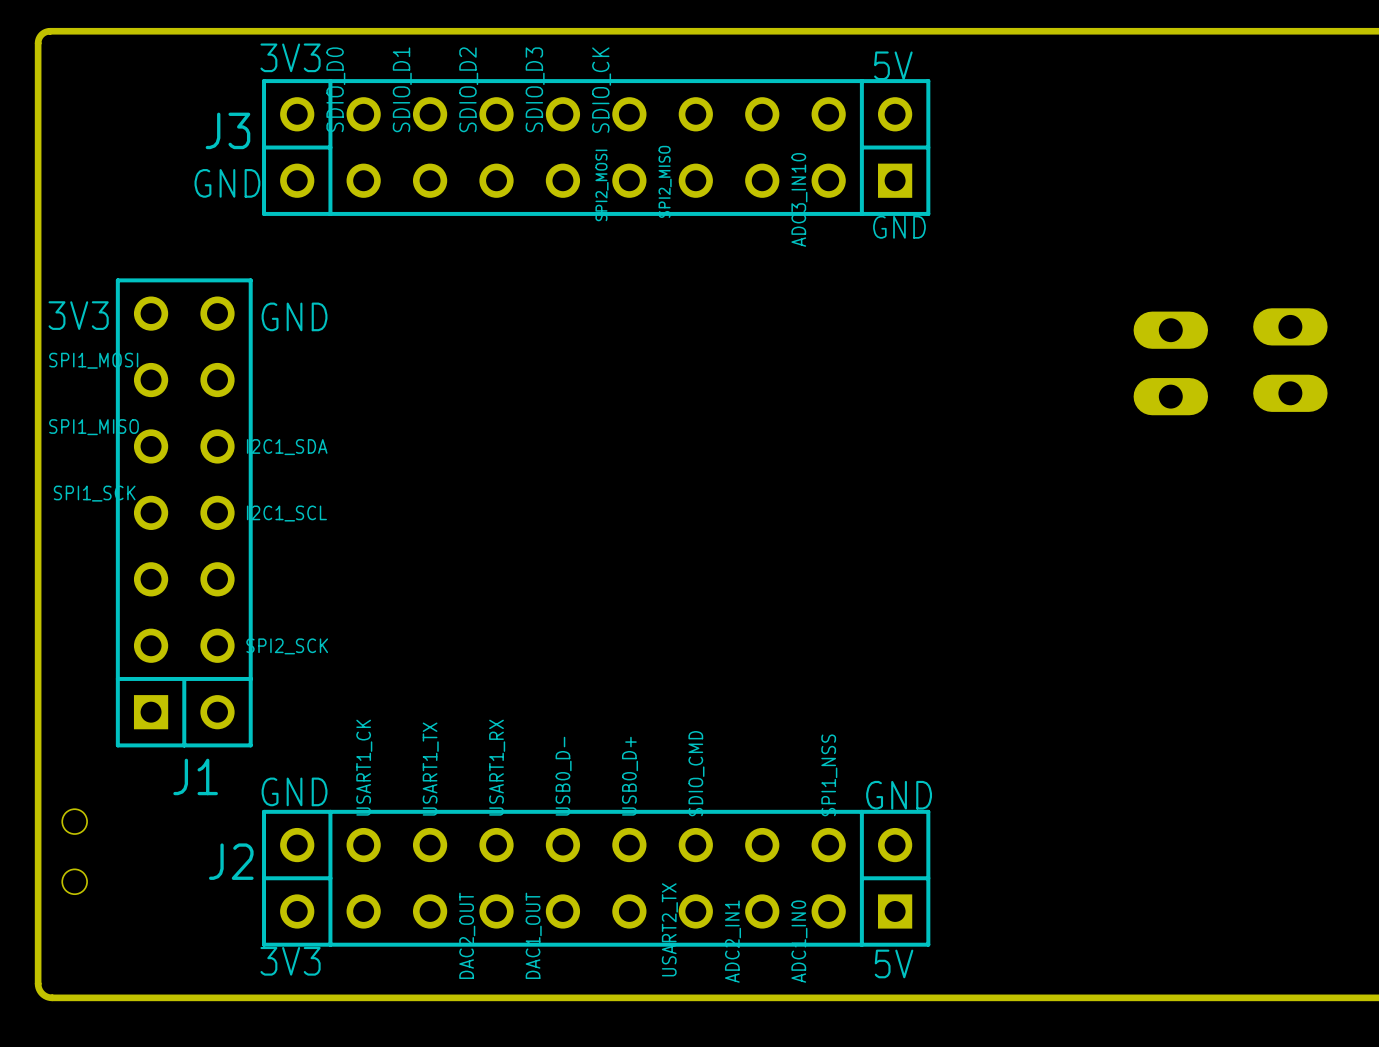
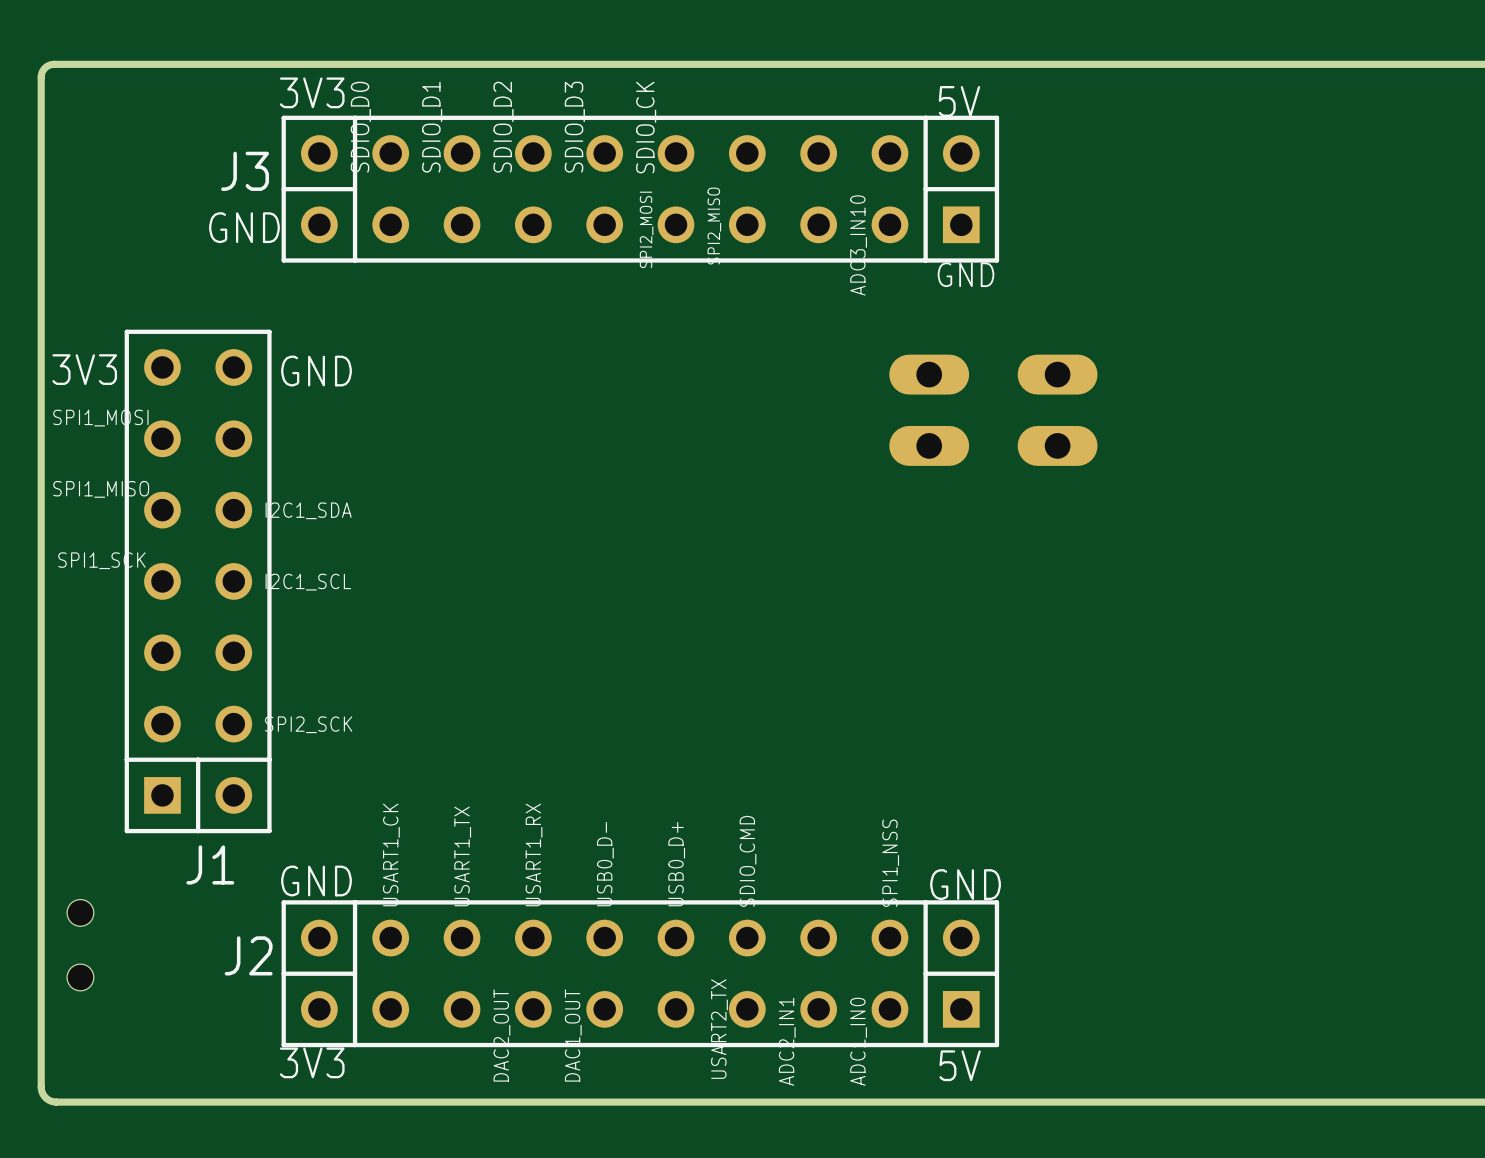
part: none -> (929, 410)
part: none -> (1057, 410)
part: (1290, 360) -> none
part: (1170, 363) -> none

